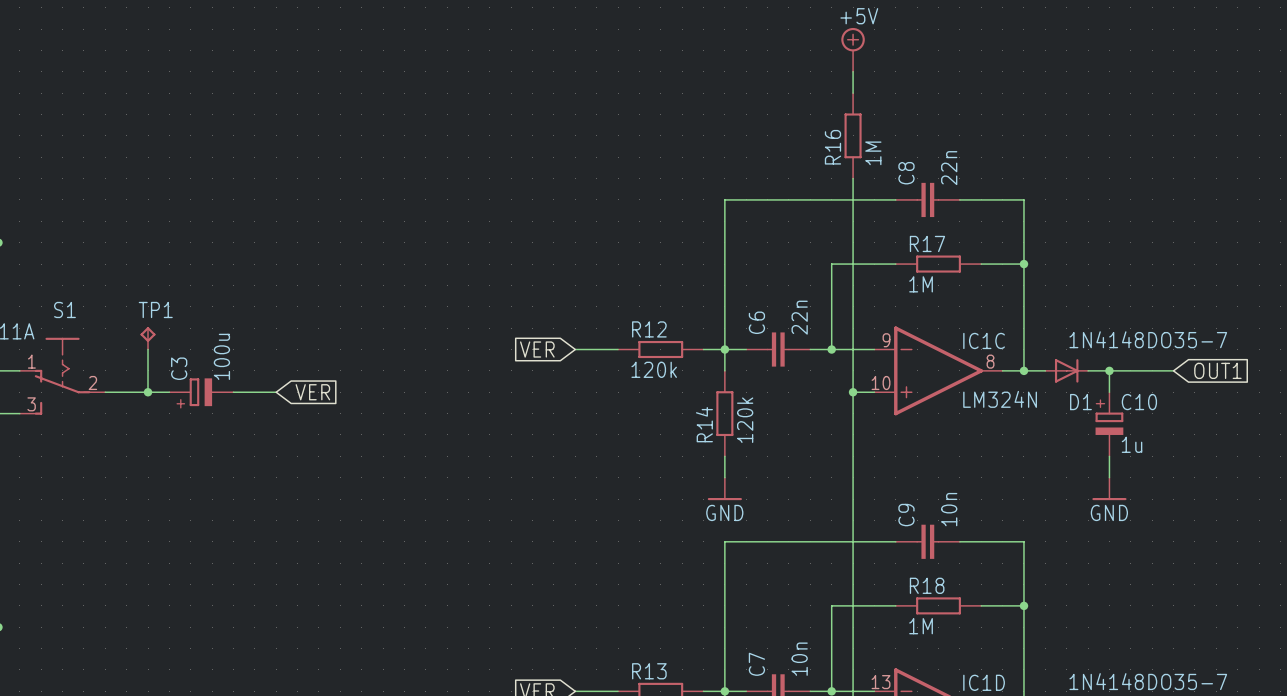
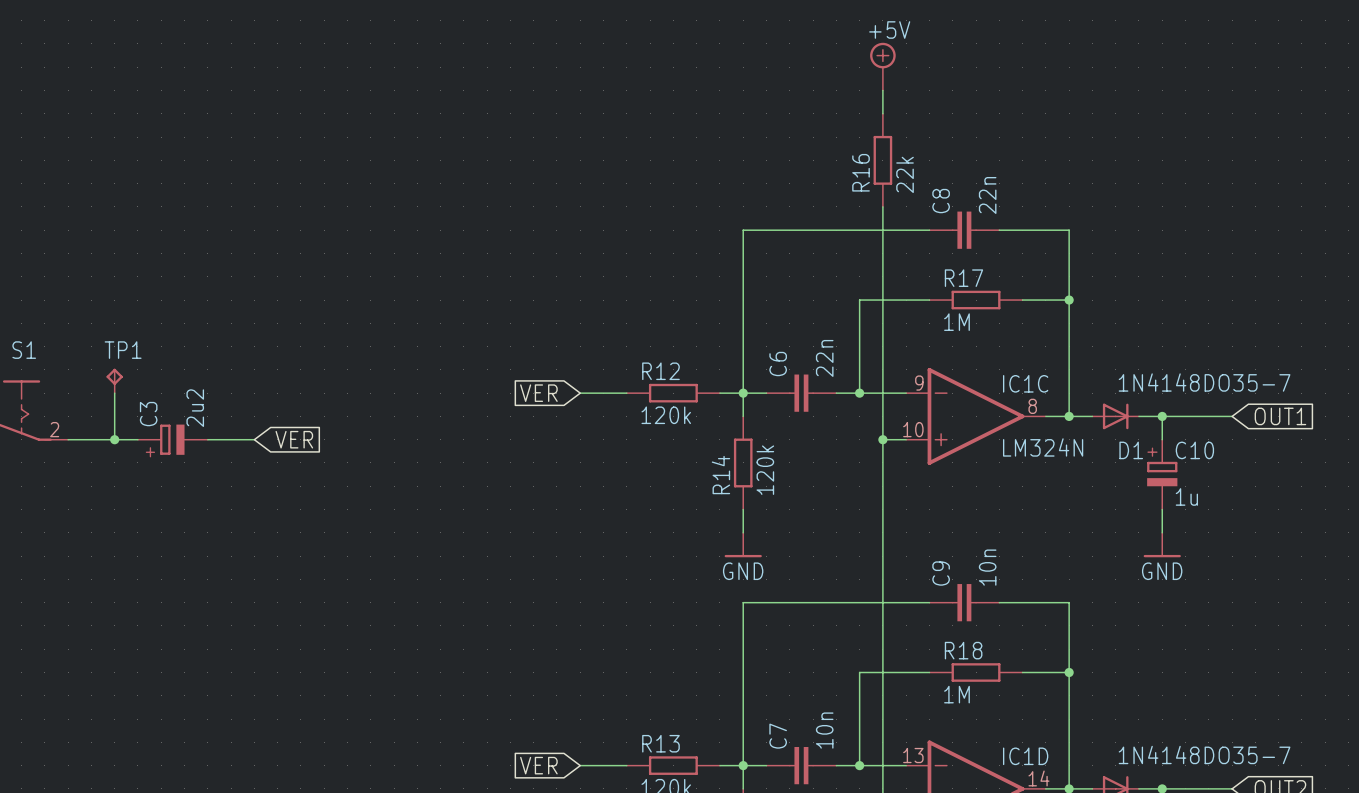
R16 value: 1M (873, 153) -> 22k (905, 174)
C3 value: 100u (221, 356) -> 2u2 (195, 408)

